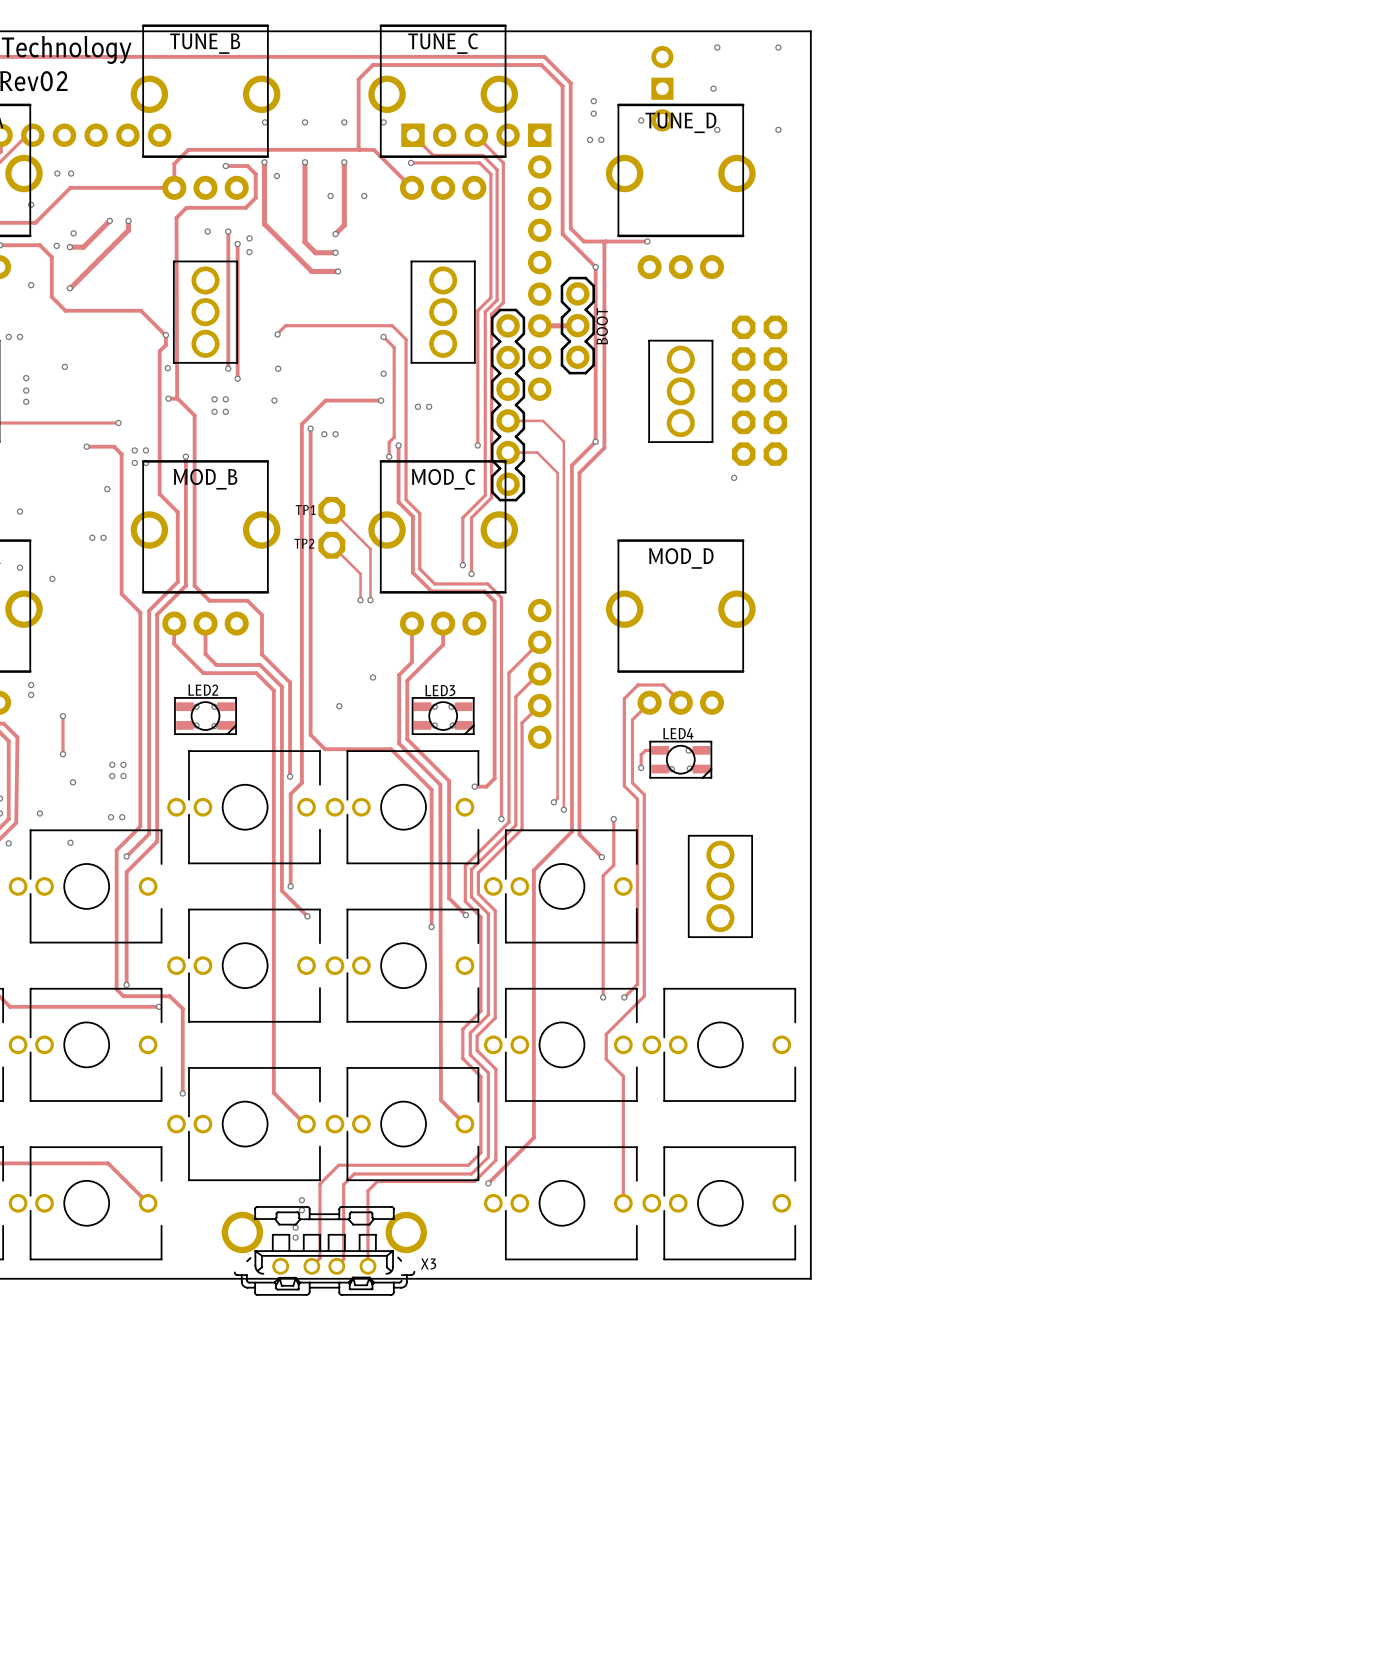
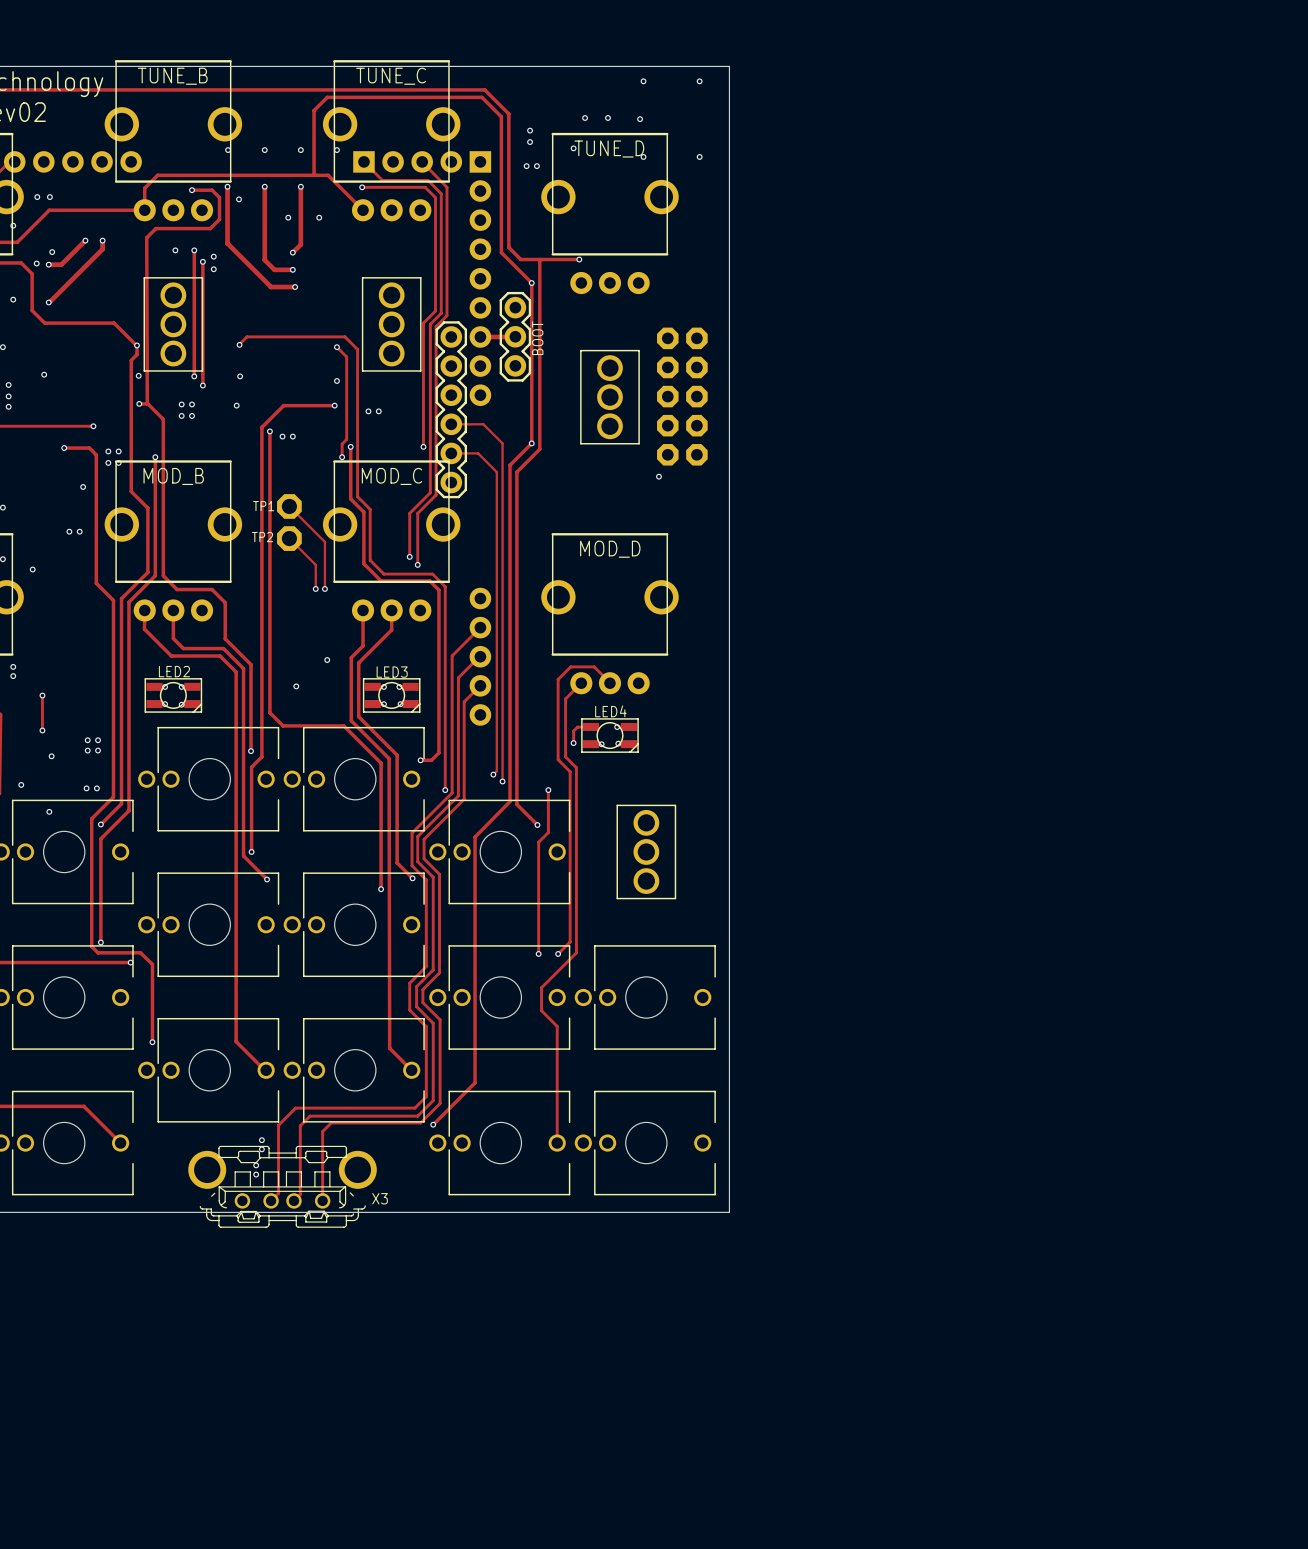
via: none -> (585, 118)
via: none -> (607, 118)
part: (662, 88) -> none

